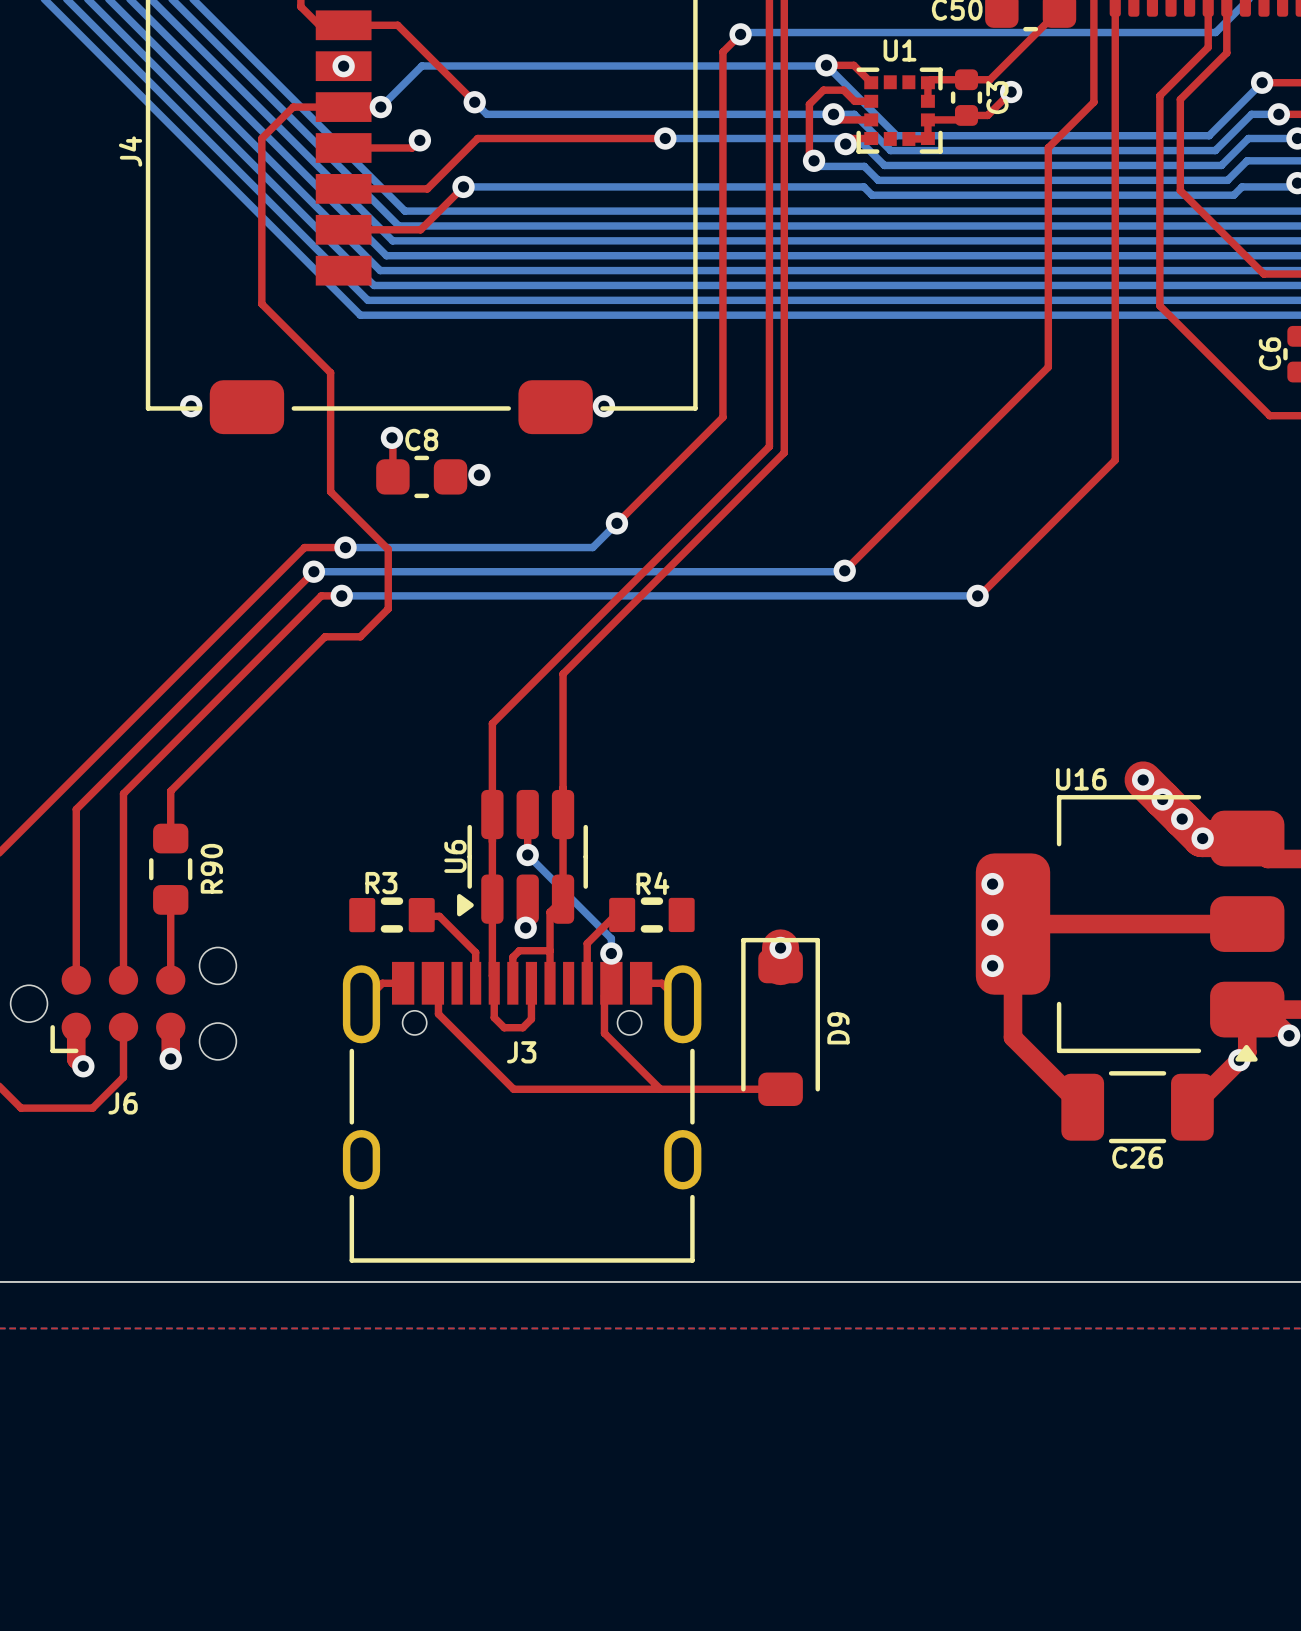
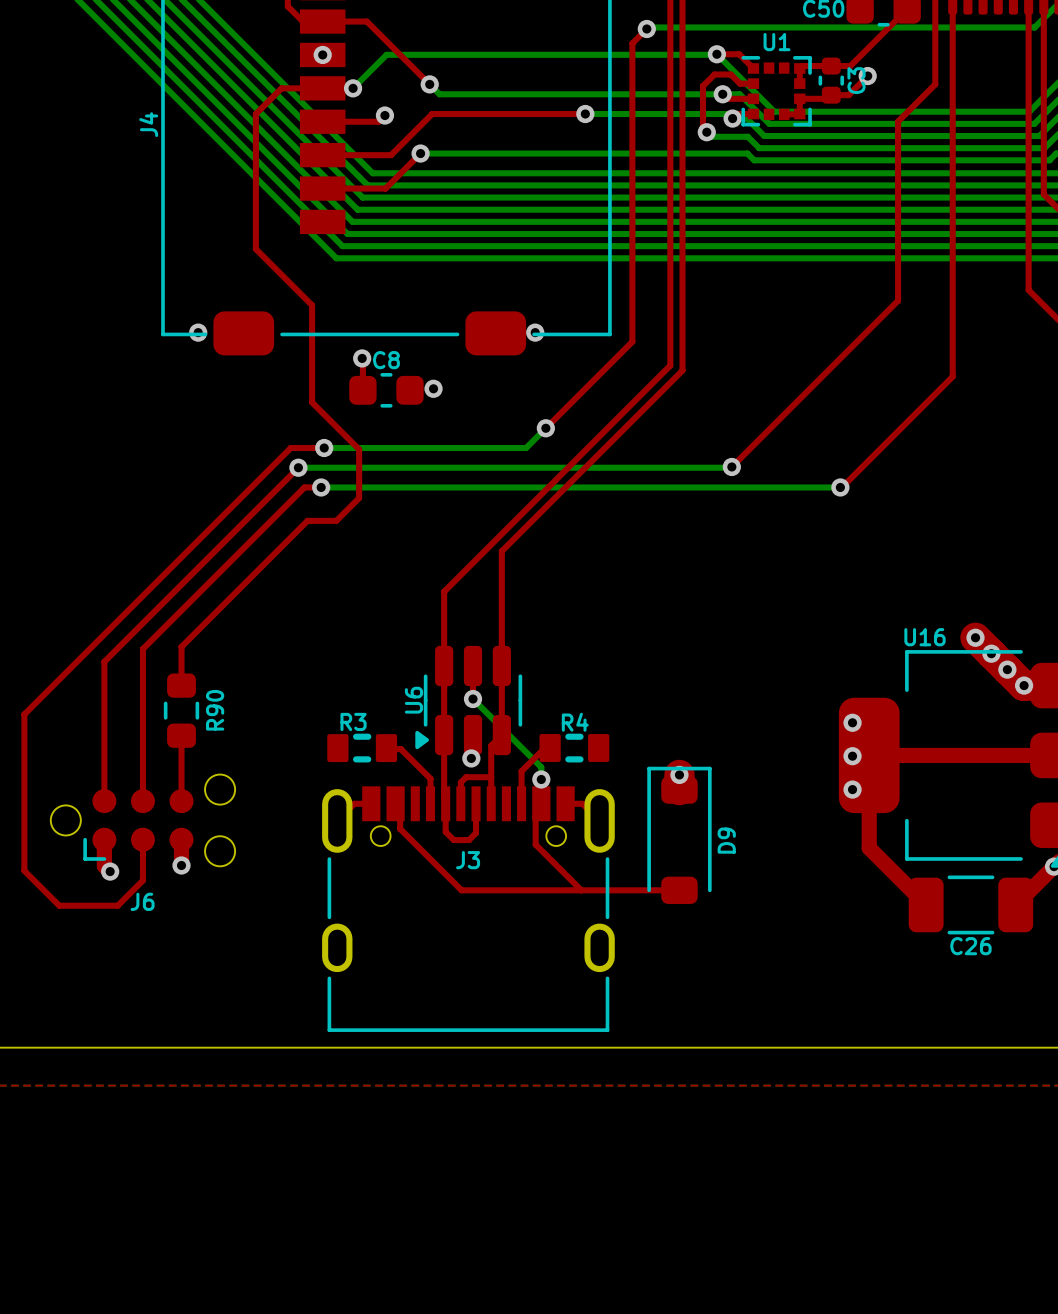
top track: (1208, 47) (1159, 95) (1159, 305) (1208, 354) -> (1028, 39) (1028, 290)
top track: (1226, 52) (1180, 99) (1180, 190) (1226, 237) -> (1043, 44) (1043, 194)

